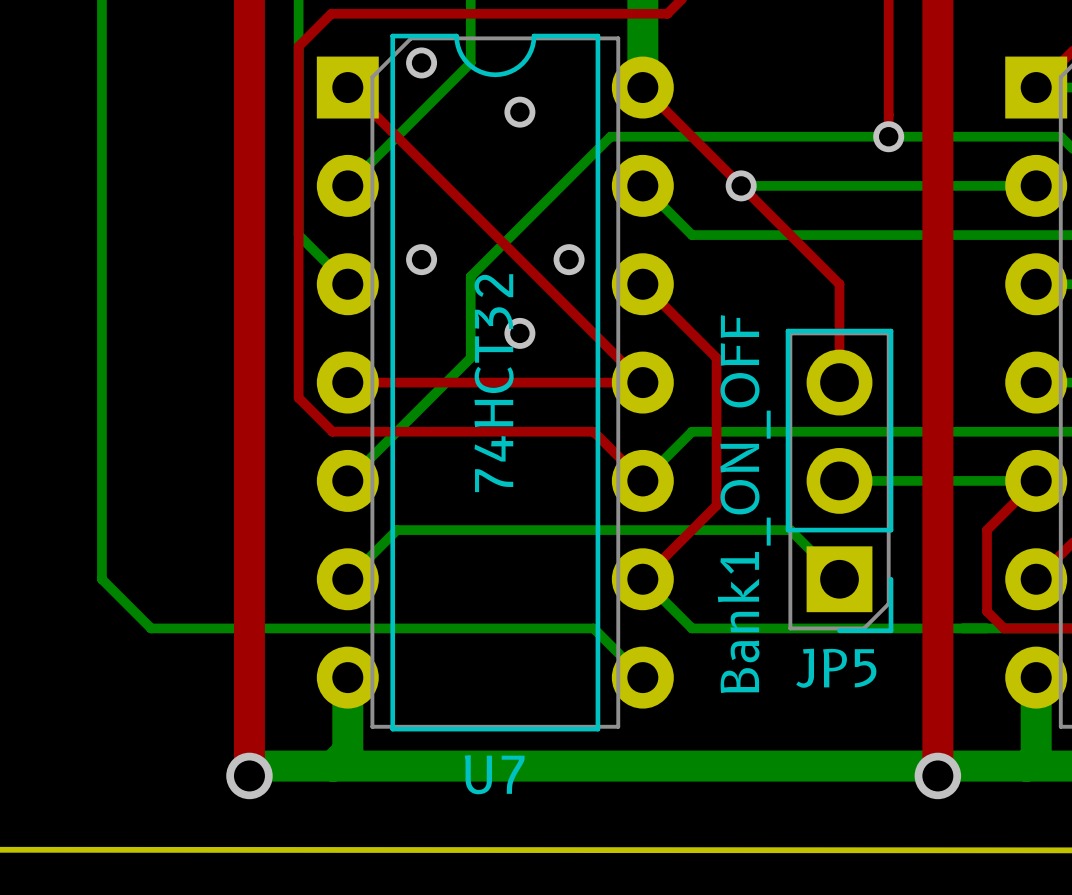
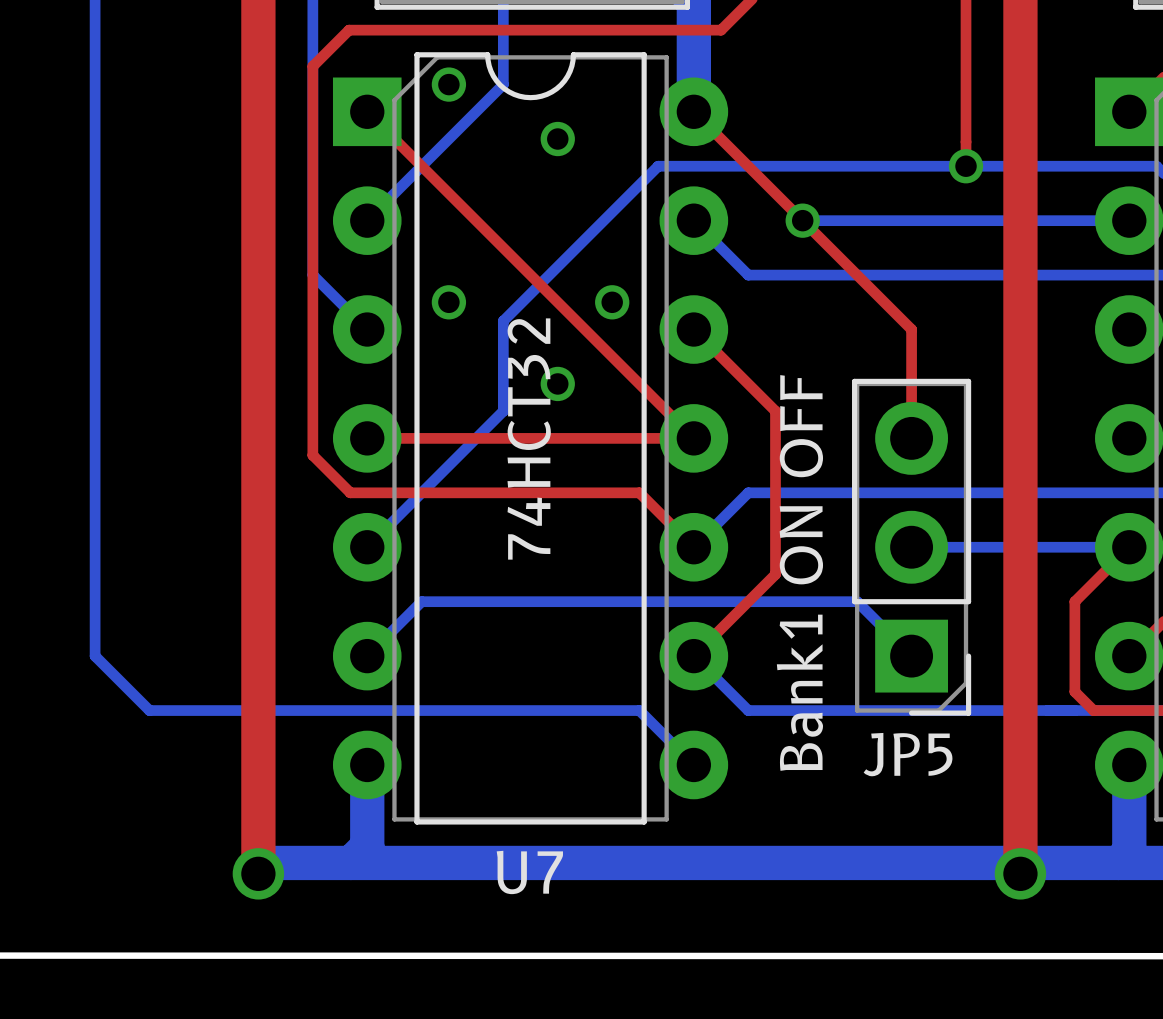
JP5 value: Bank1_ON_OFF (744, 504) -> Bank1 ON OFF (799, 572)

